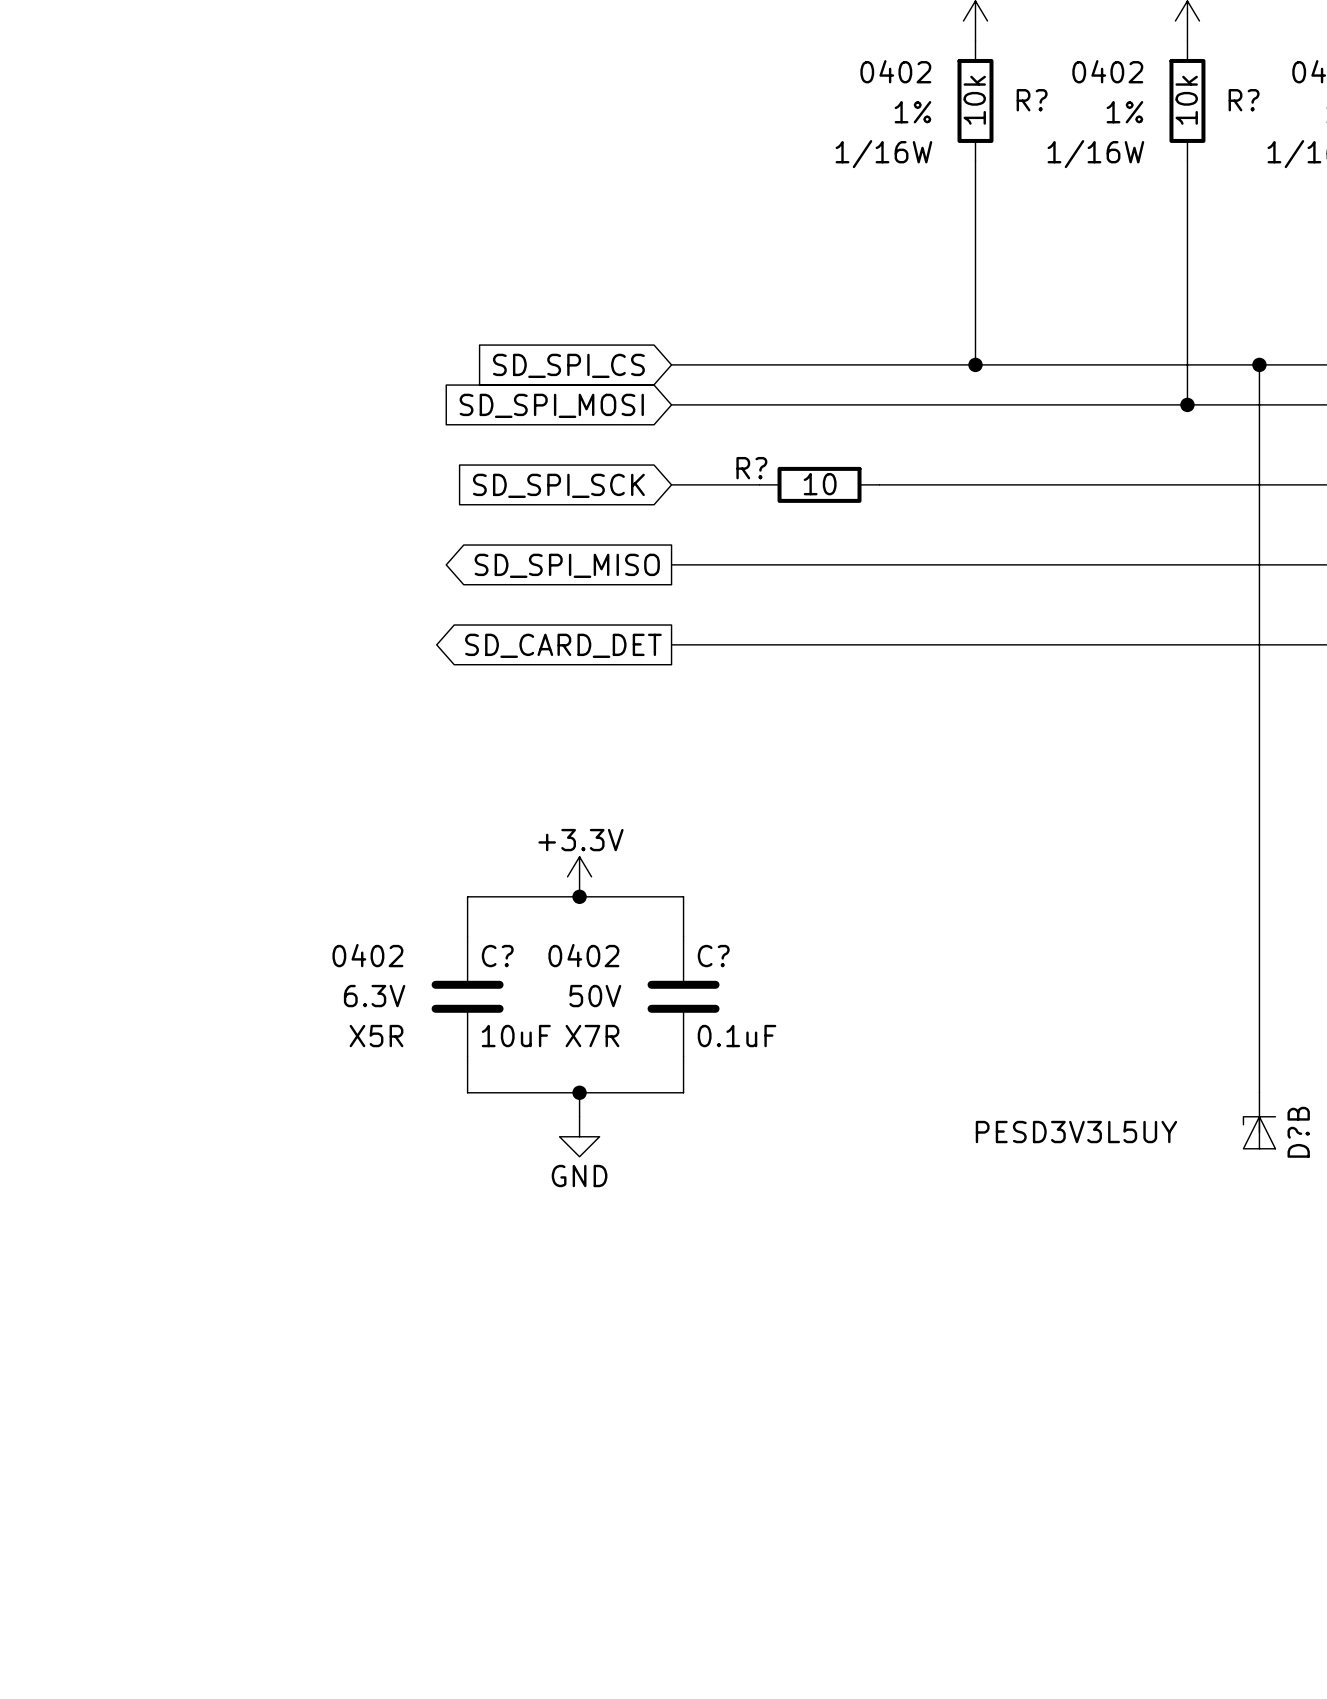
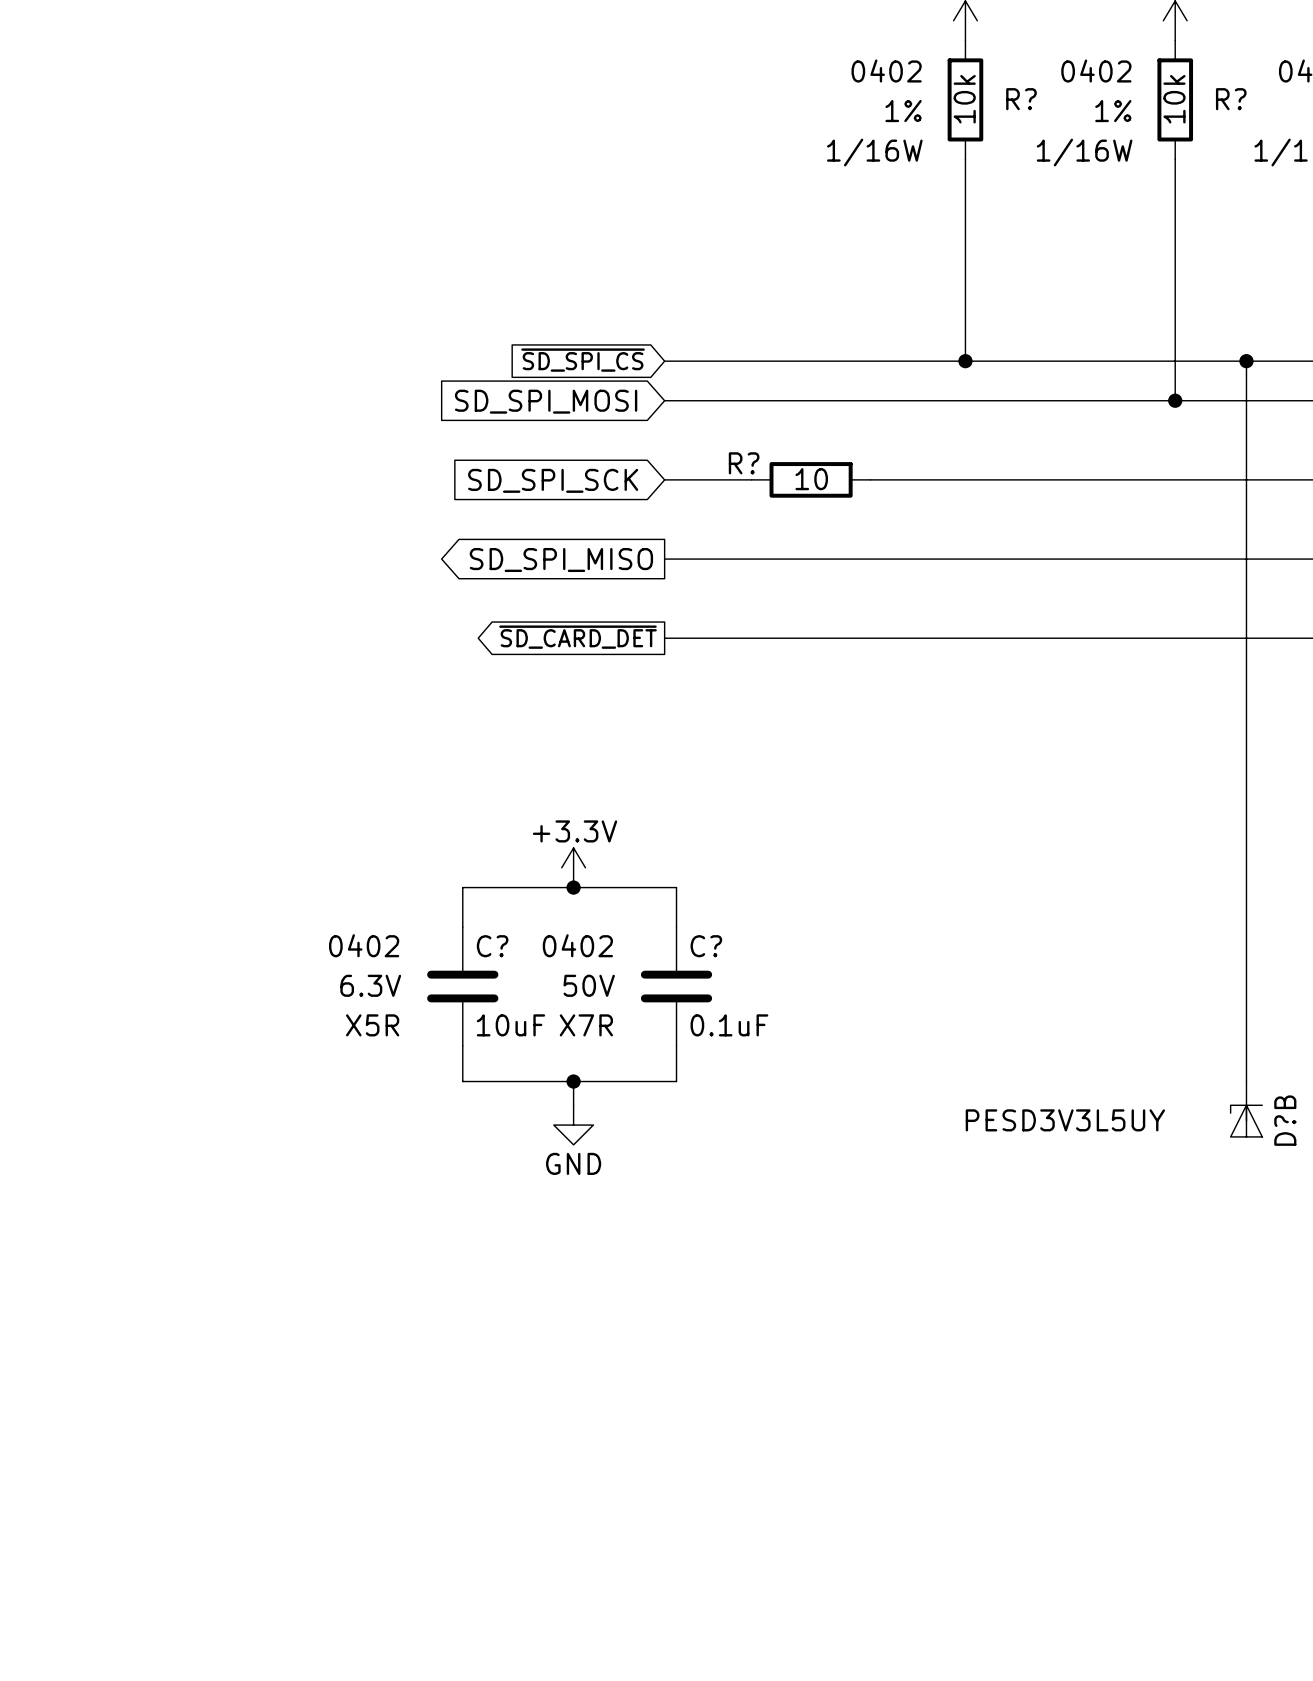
global label: SD_SPI_CS (568, 365) -> ~{SD_SPI_CS} (583, 360)
global label: SD_CARD_DET (563, 645) -> ~{SD_CARD_DET} (578, 637)

